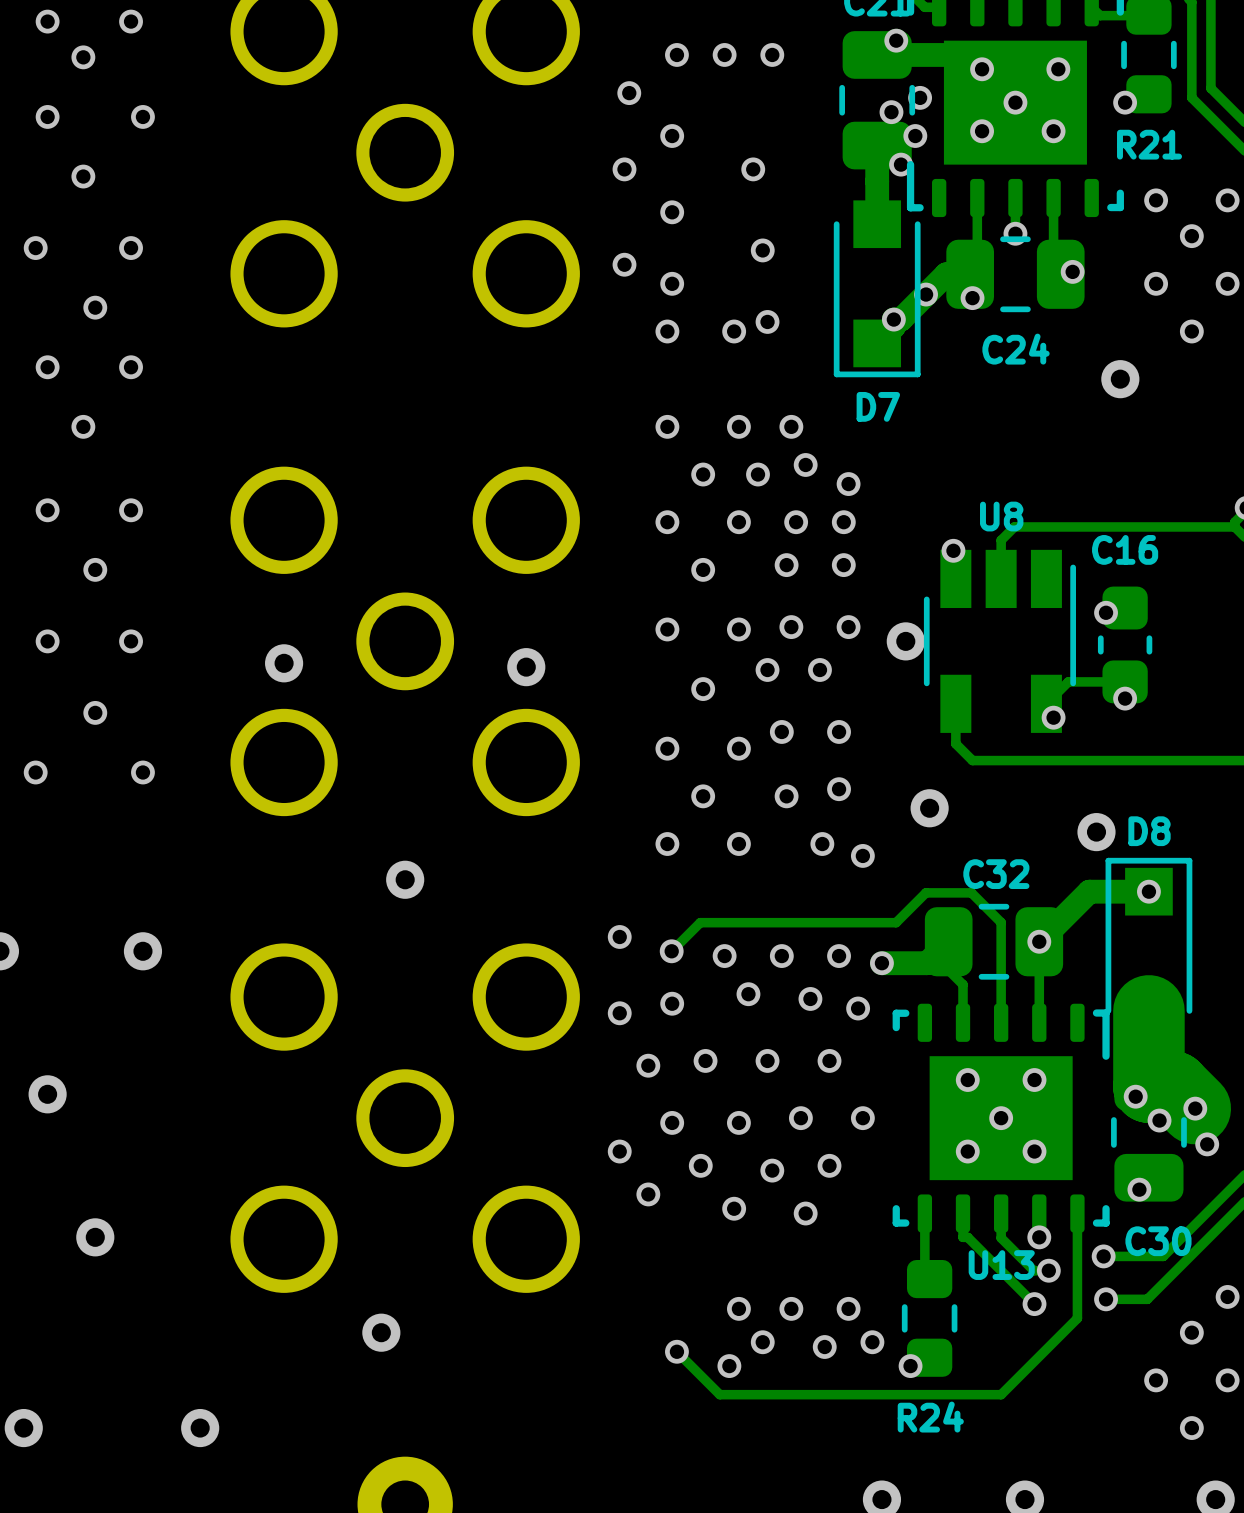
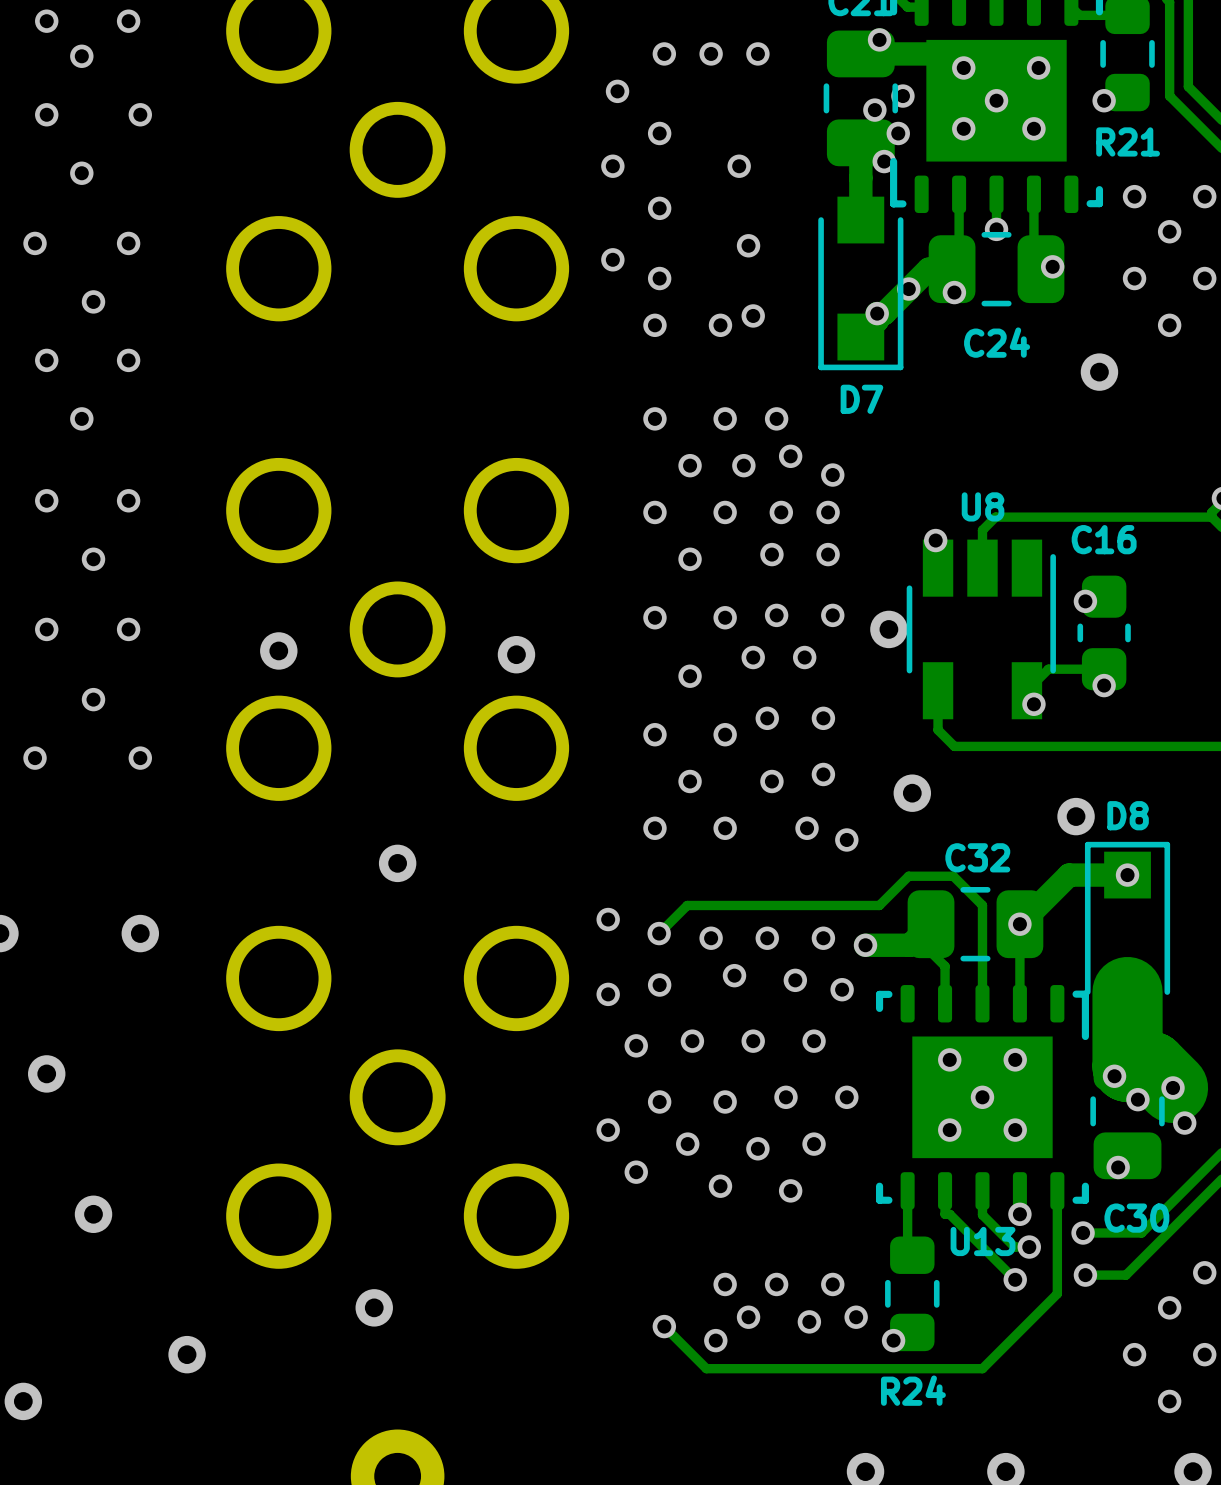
via position: (200, 1428) -> (187, 1354)

